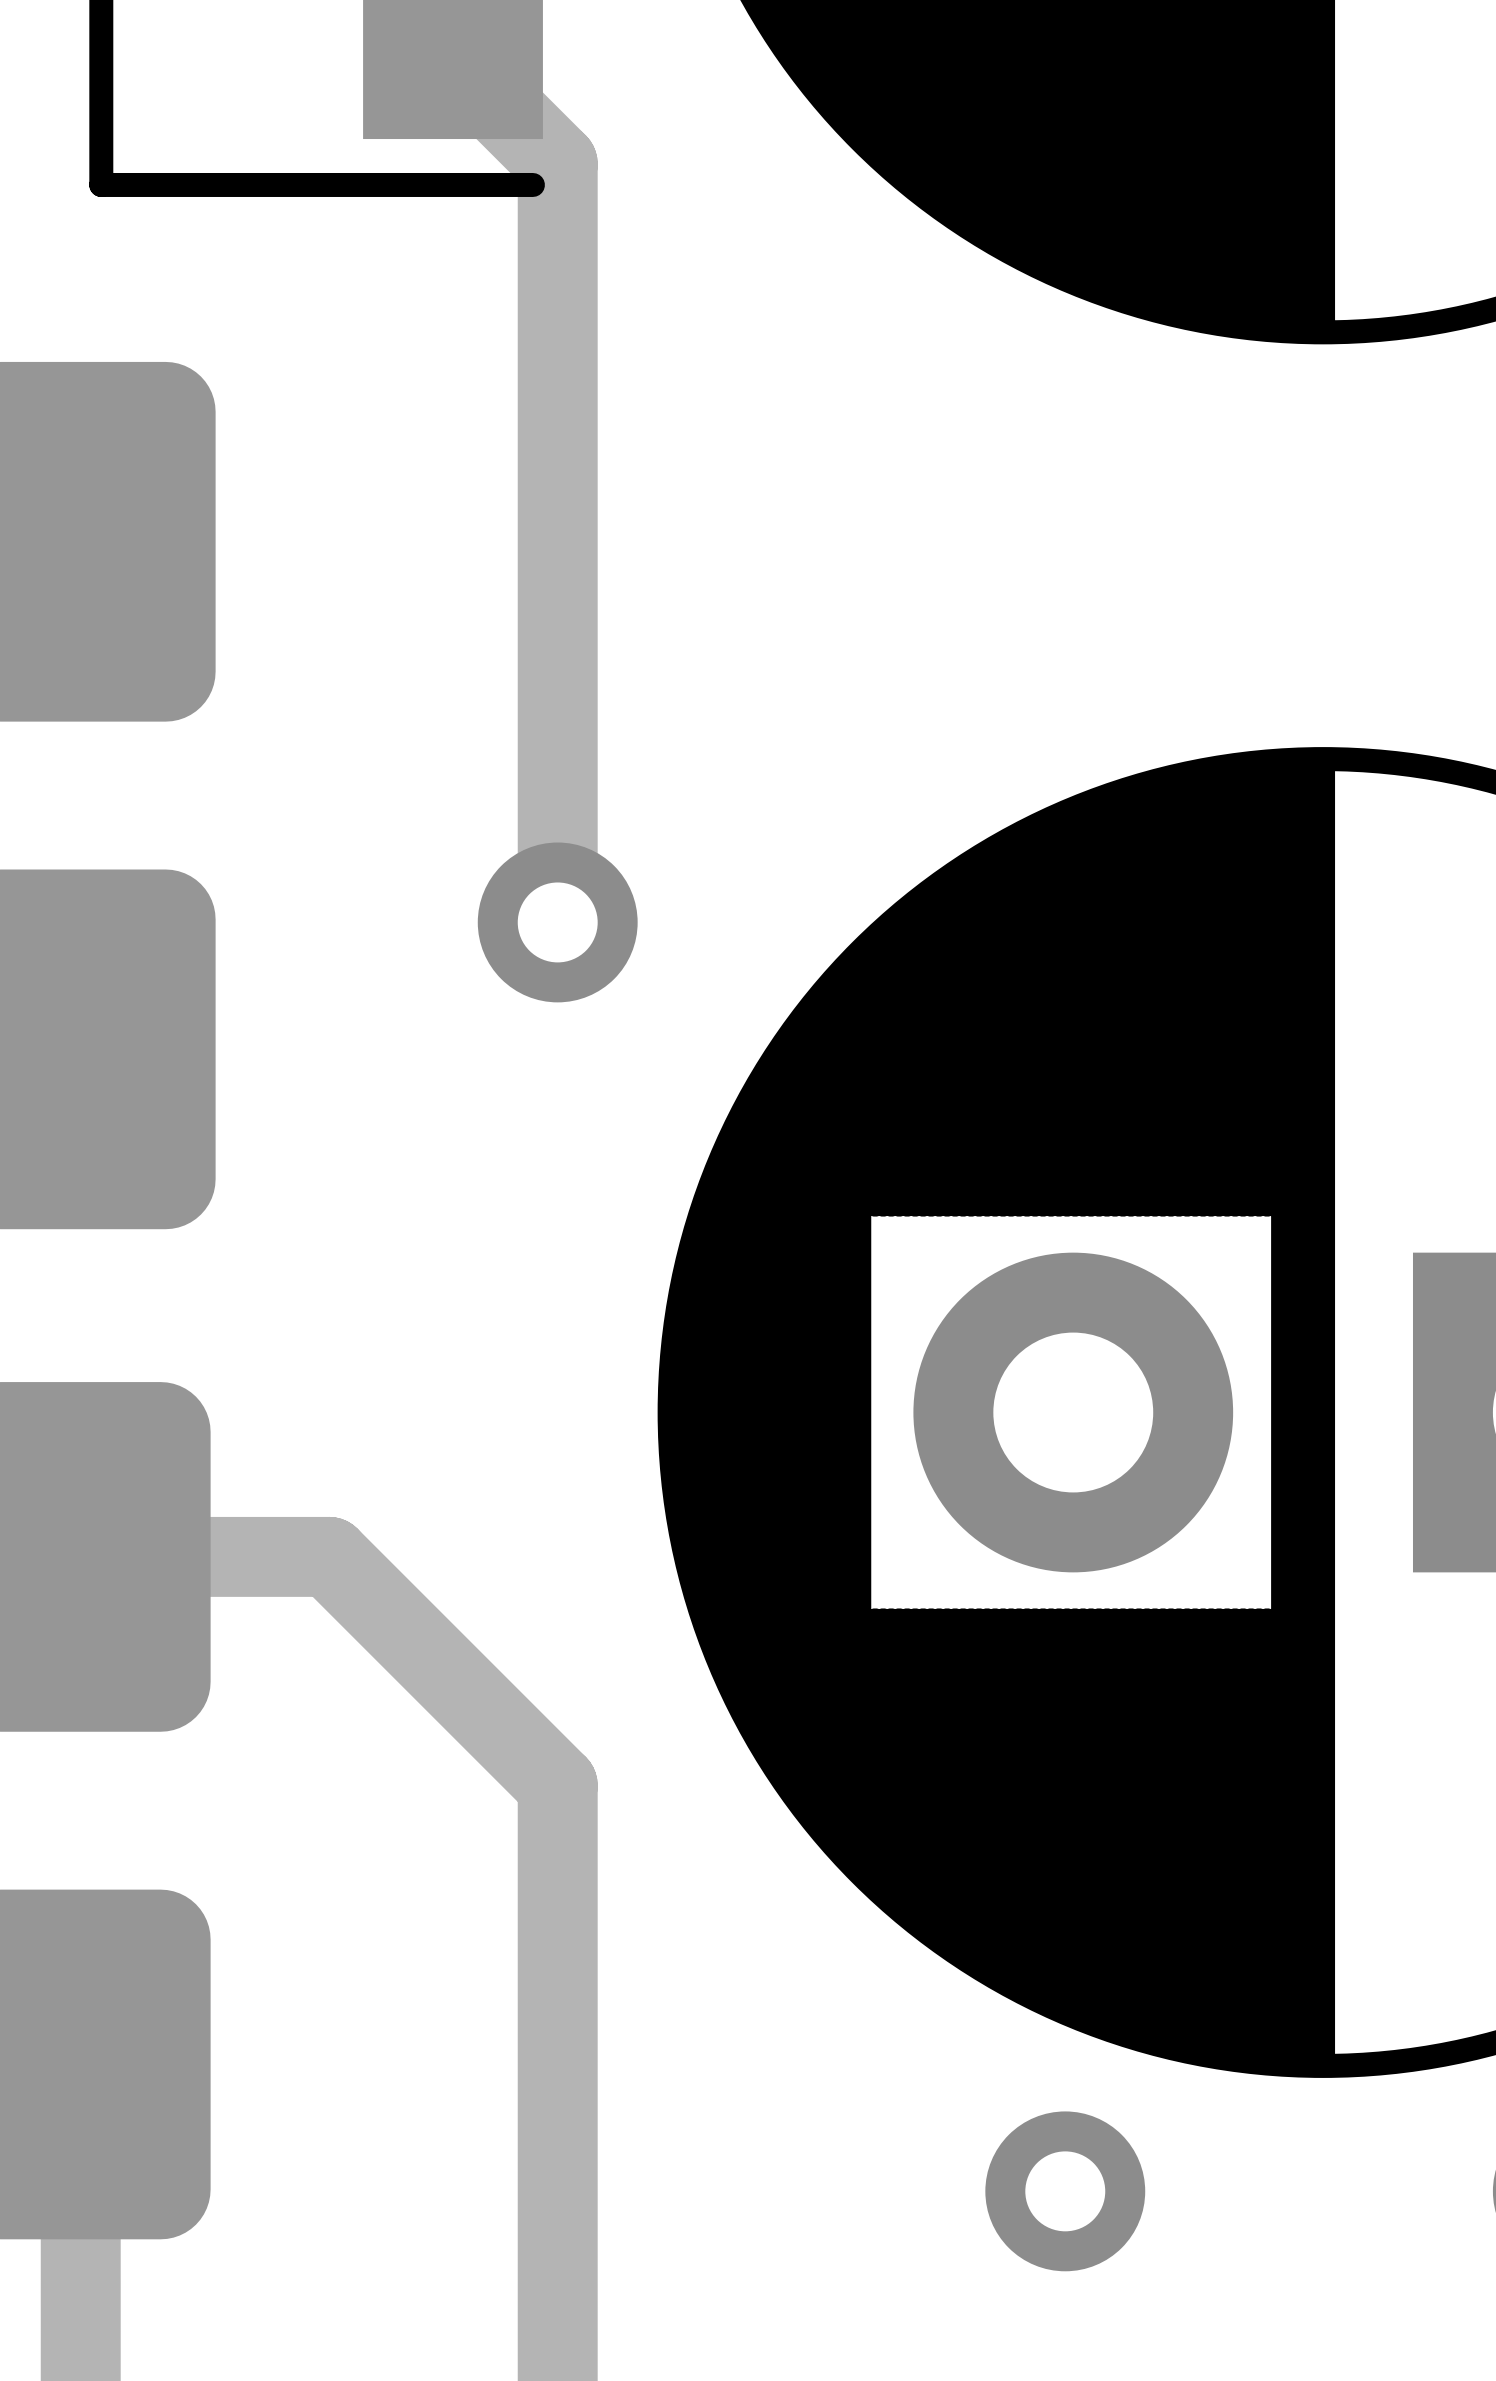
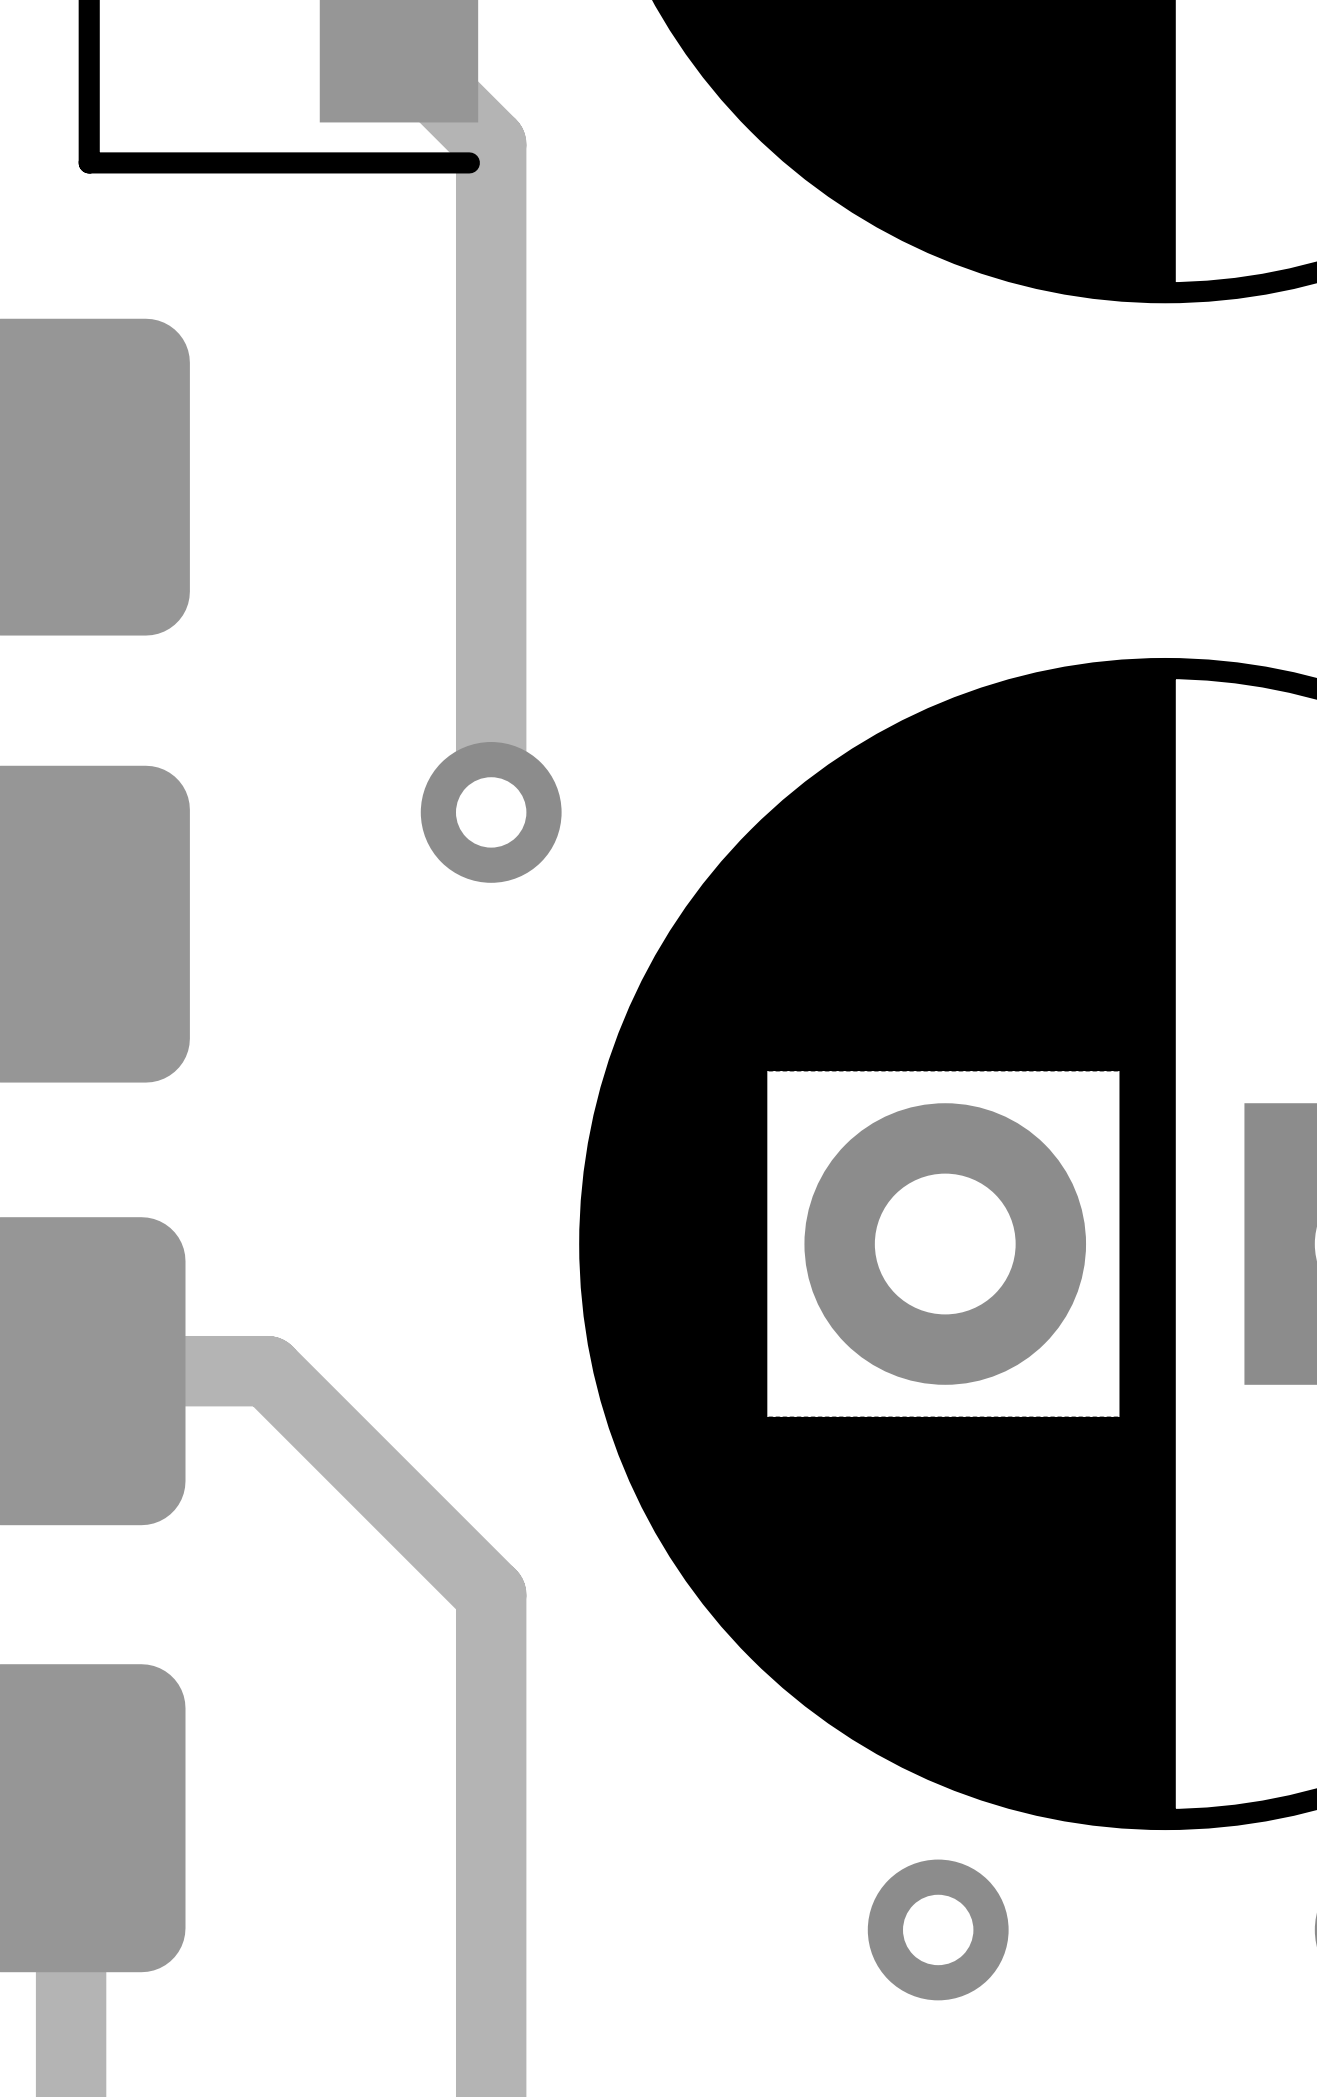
track: (303, 1556) (329, 1556) (557, 1785) (557, 1810) -> (267, 1371) (491, 1594)

